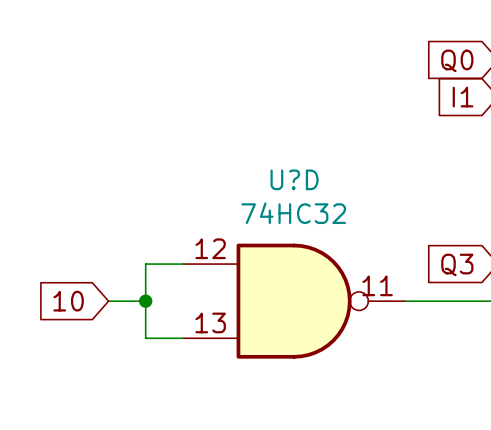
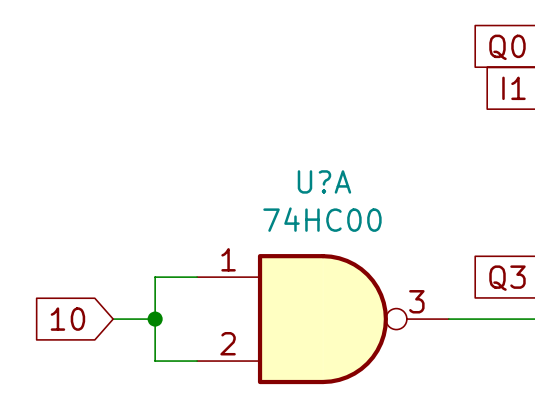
U?D name: U?D (294, 179) -> U?A (324, 181)
U?D value: 74HC32 (293, 213) -> 74HC00 (322, 219)
U?D pin number: 12 (210, 248) -> 1 (228, 259)
U?D pin number: 11 (377, 285) -> 3 (416, 301)
U?D pin number: 13 (210, 322) -> 2 (228, 343)

